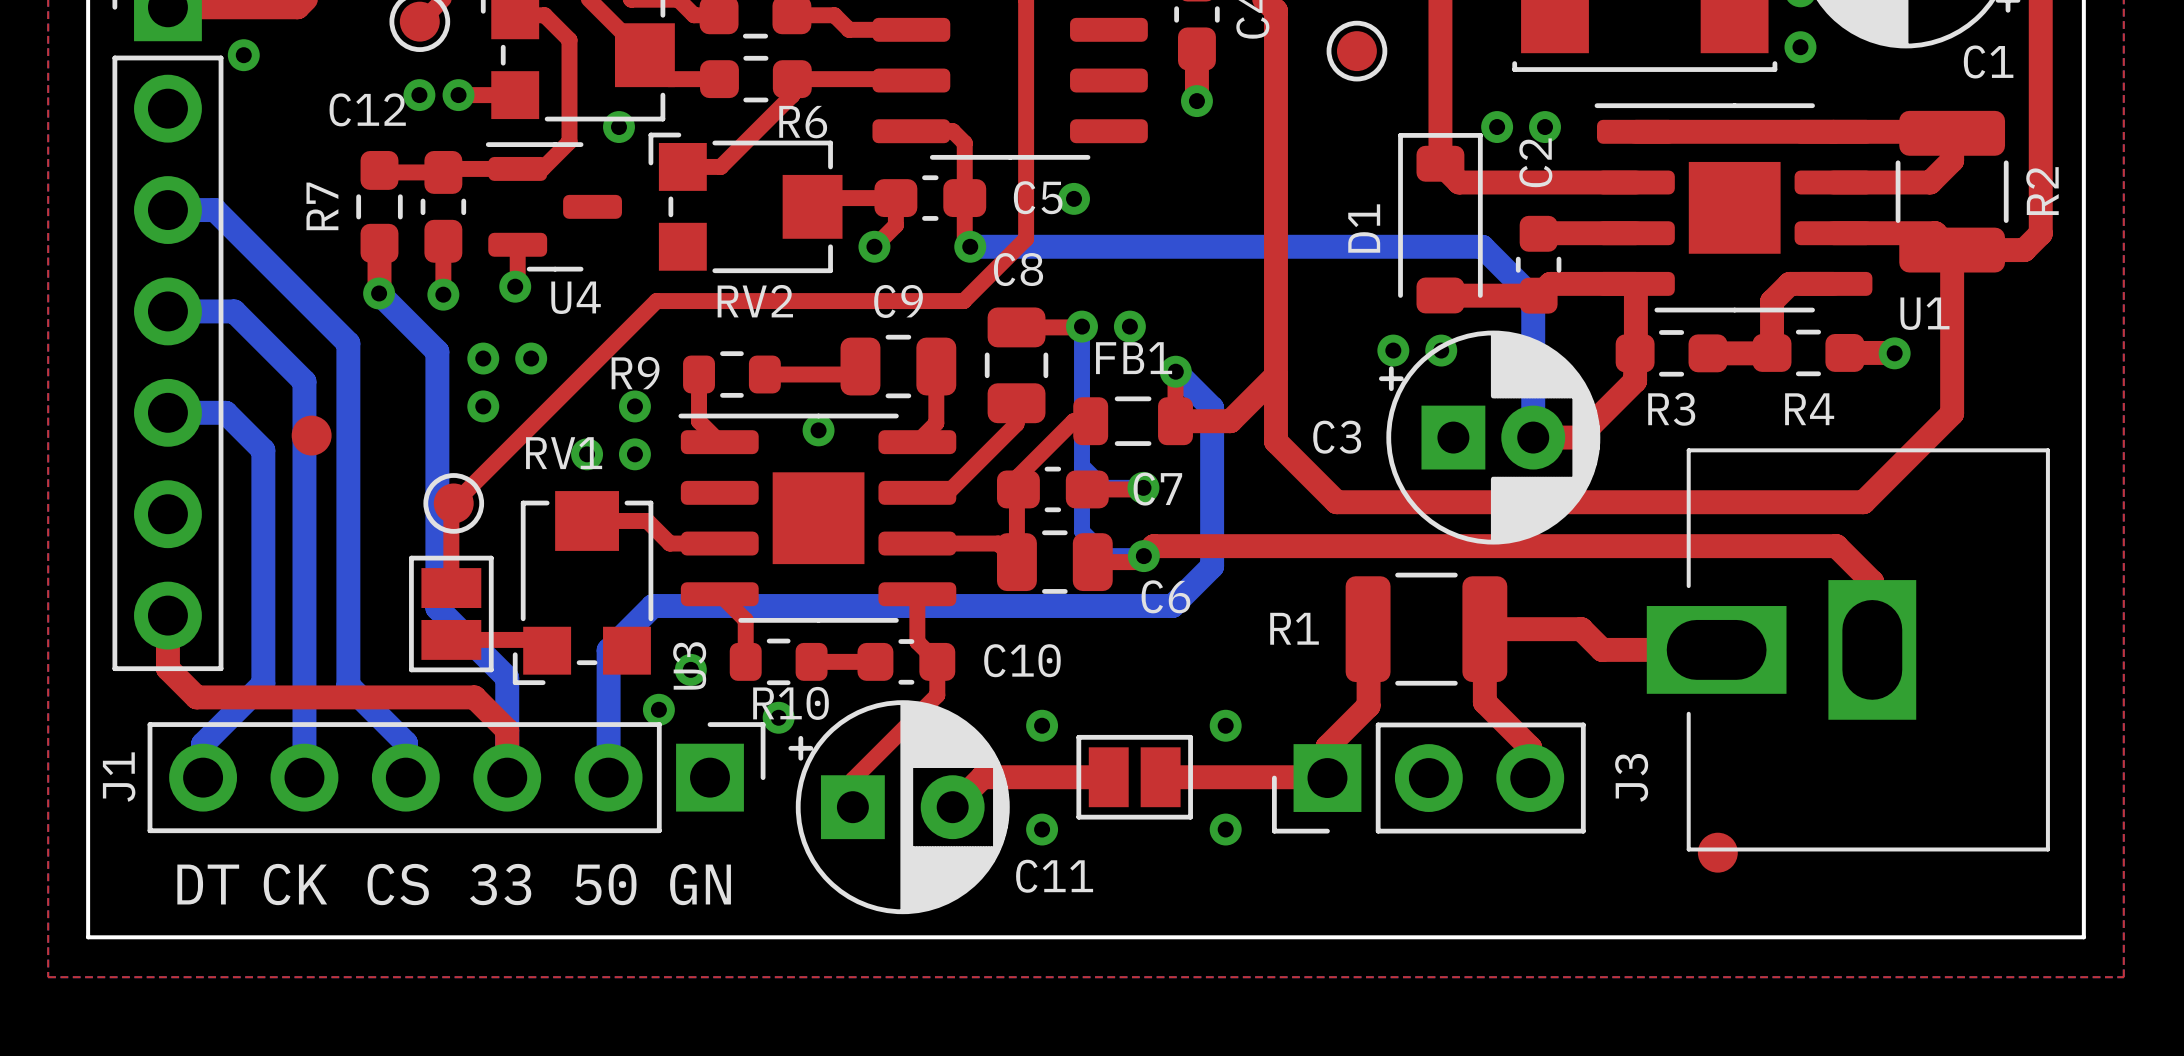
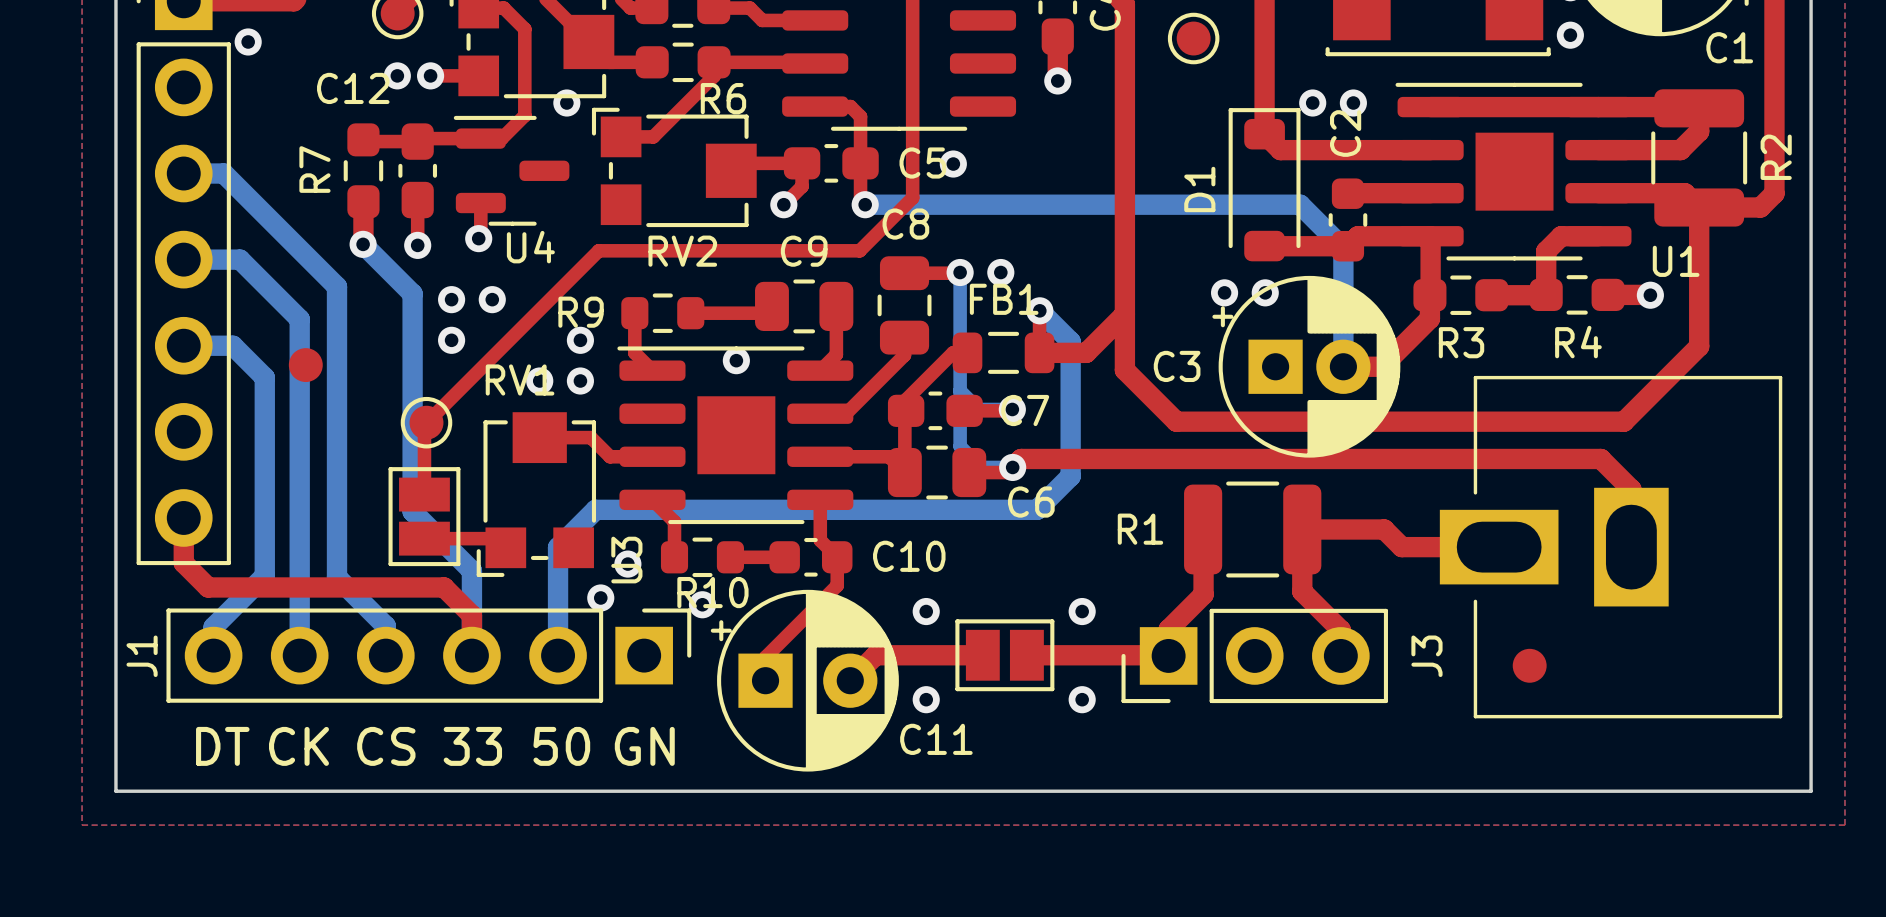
part position: (1717, 852) -> (1529, 665)

